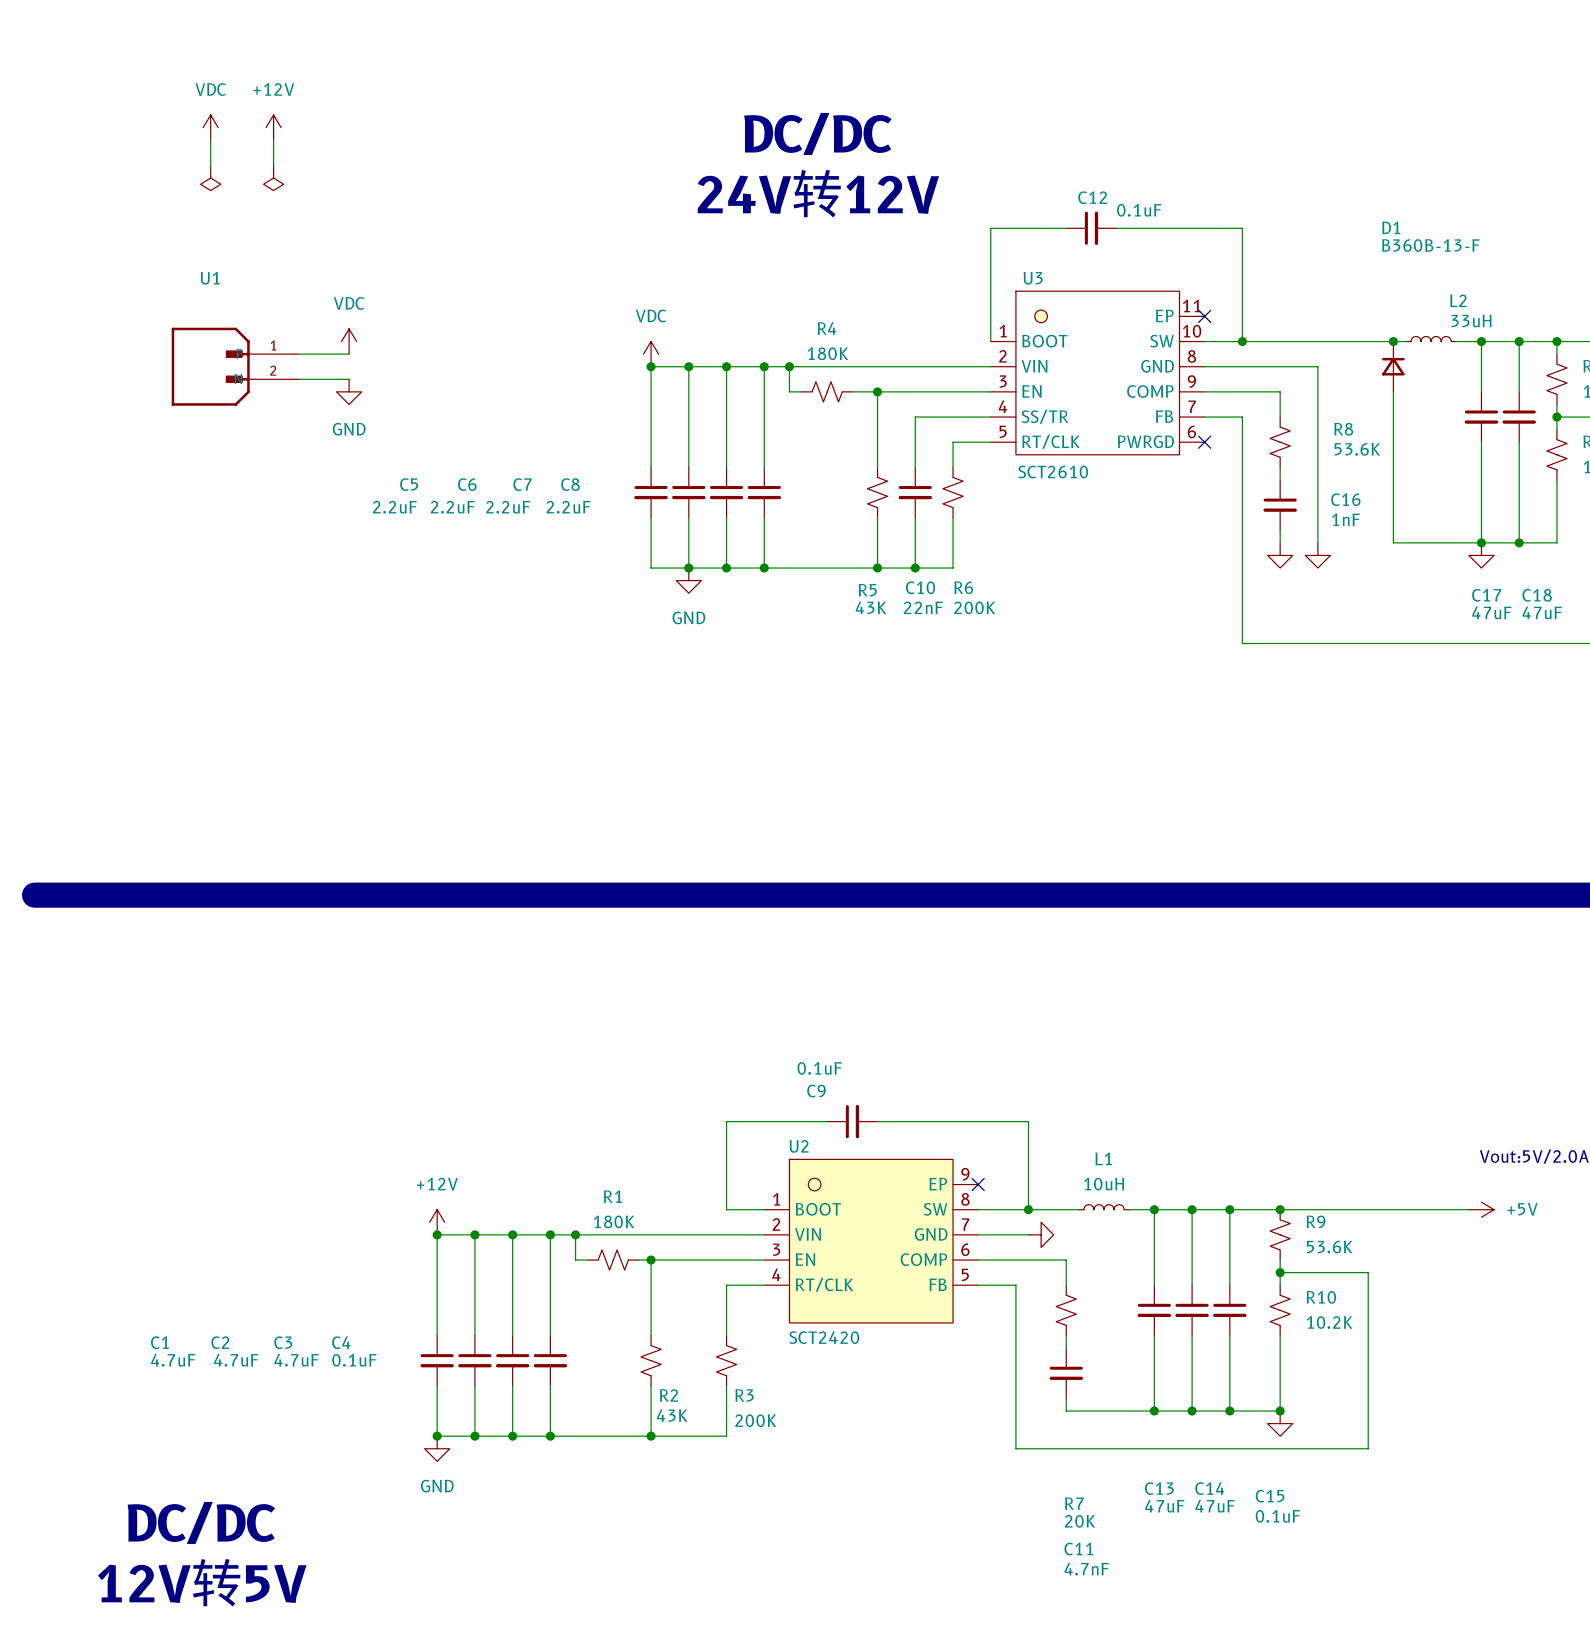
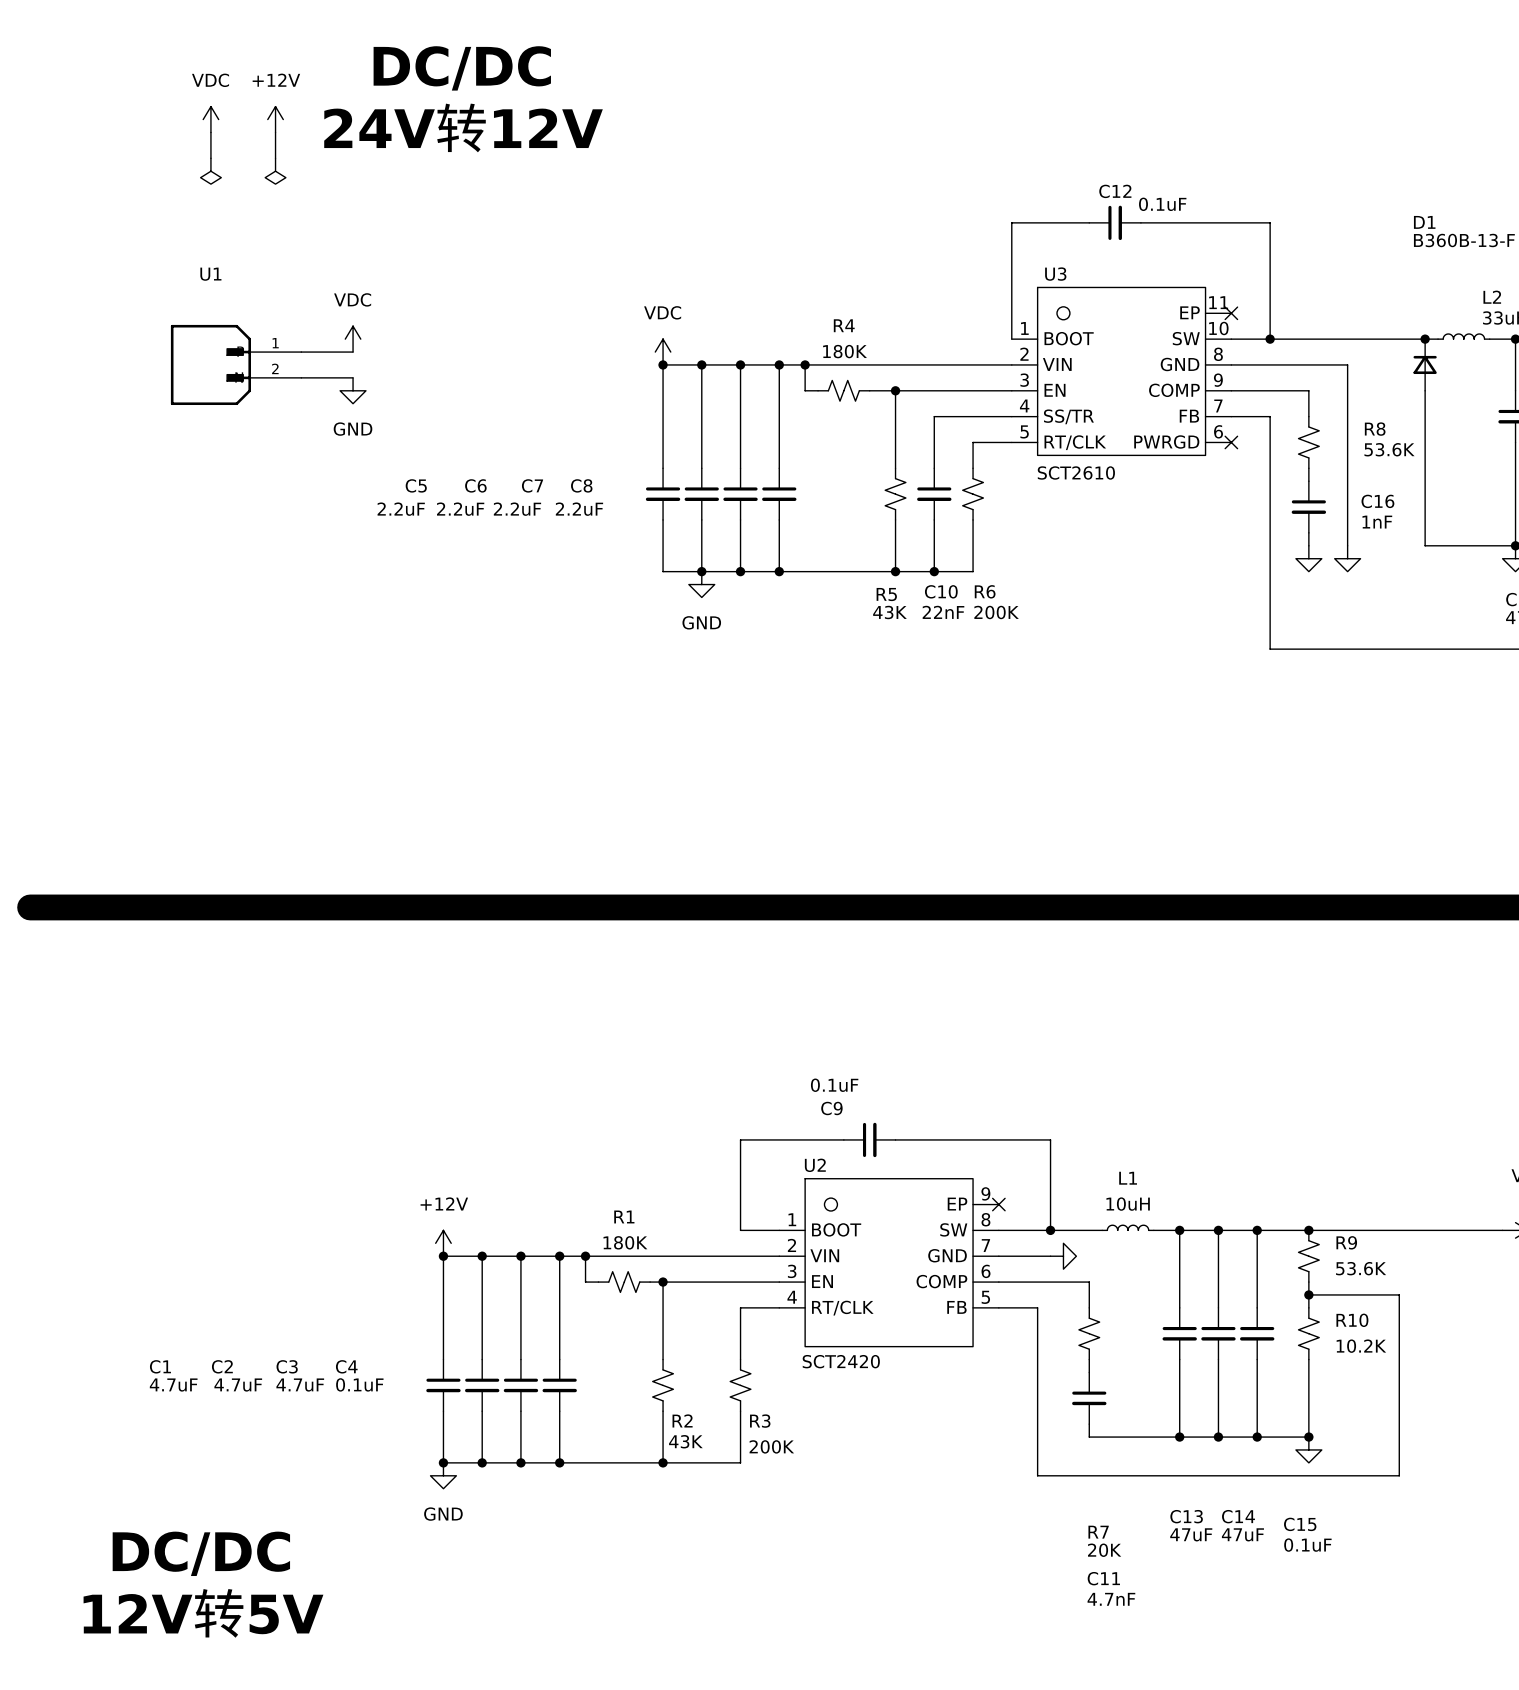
text: none -> DC/DC (462, 68)
text: DC/DC (817, 133) -> none
text: none -> 24V转12V (463, 127)
text: 24V转12V (818, 193) -> none

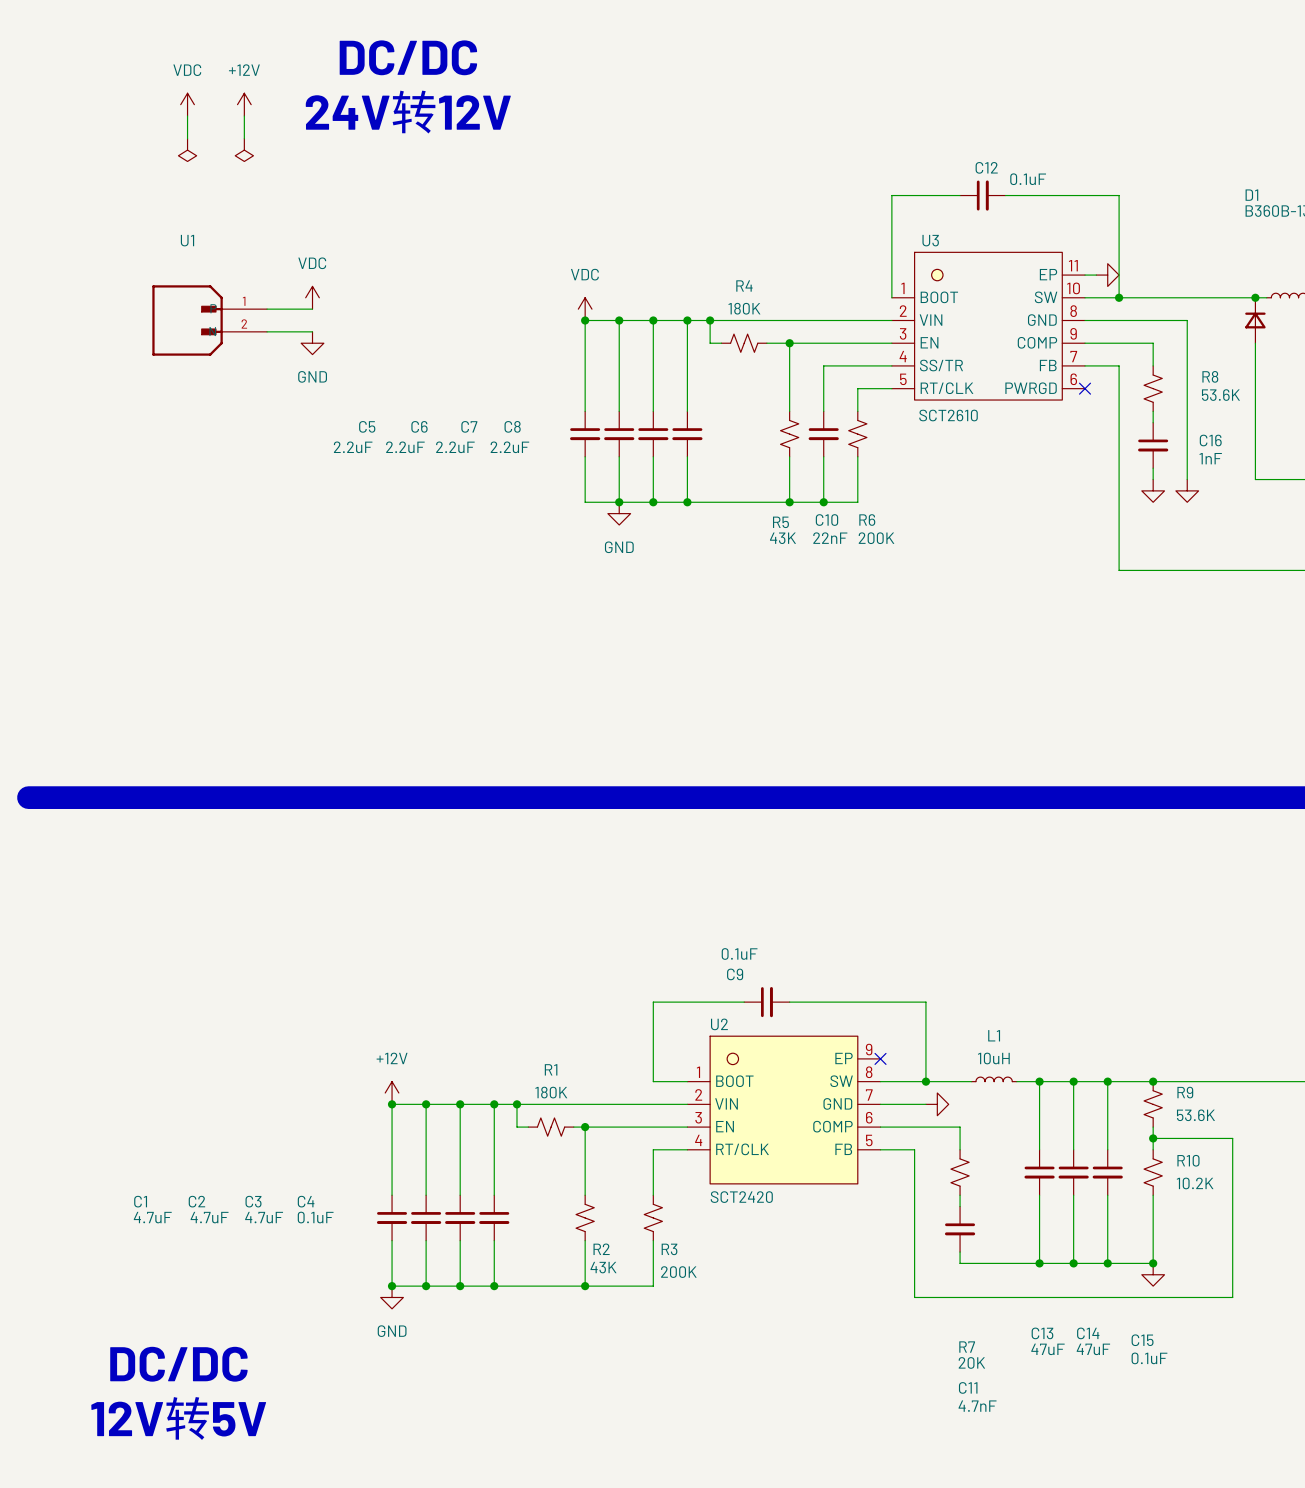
wire: none -> (1085, 275) (1096, 275)
no-connect mark: (1231, 313) -> none
power symbol: none -> (1107, 275)

